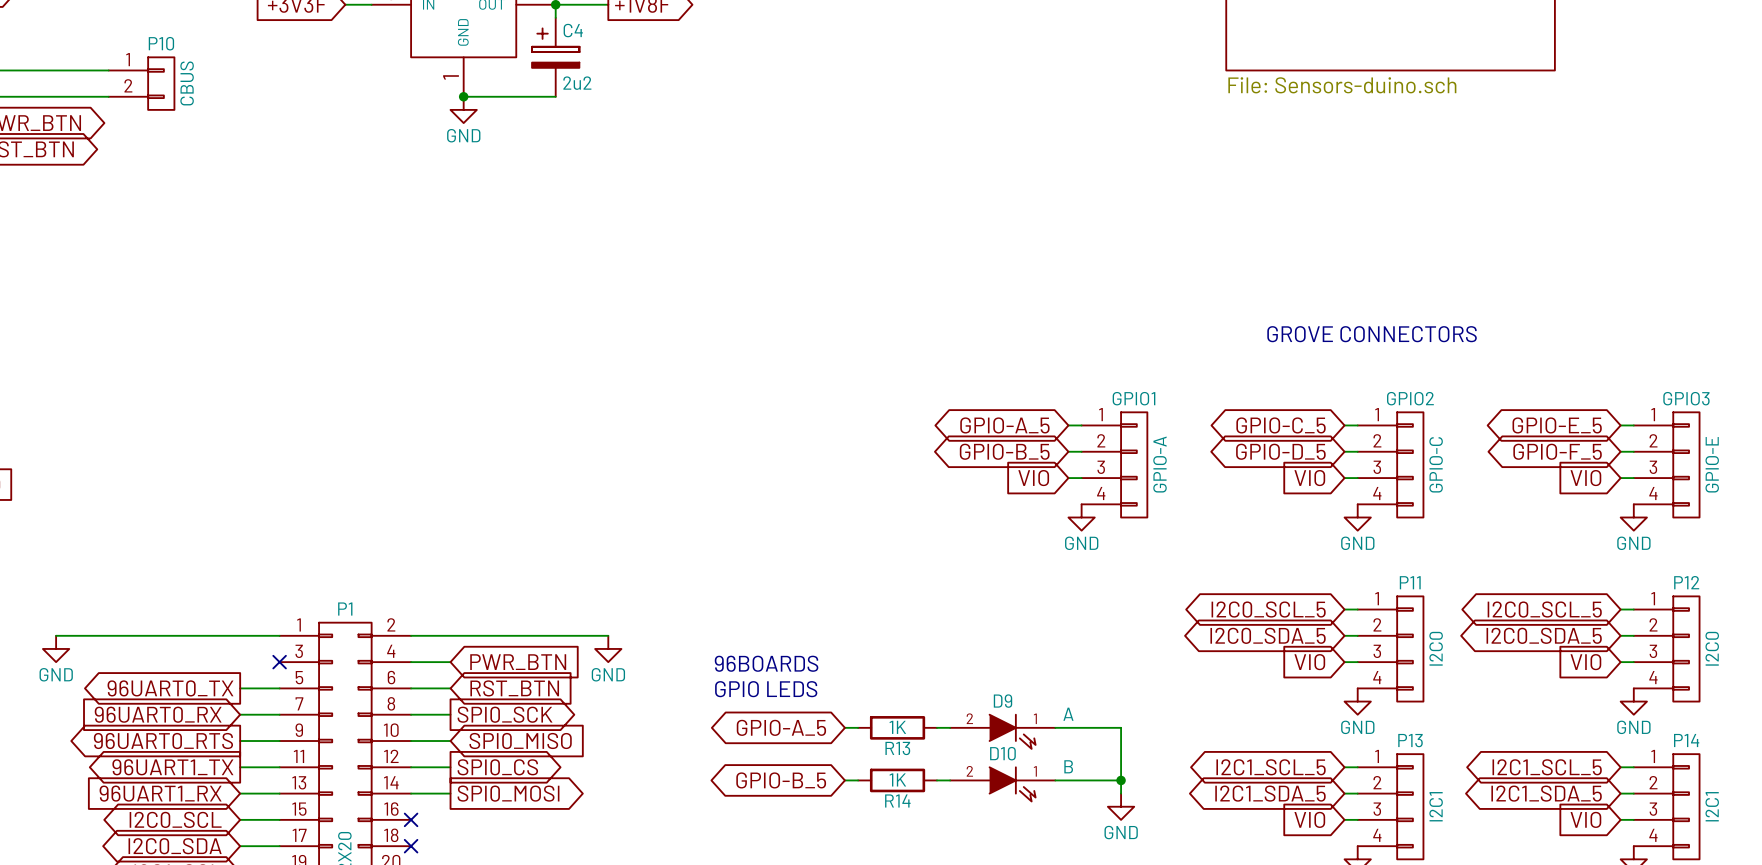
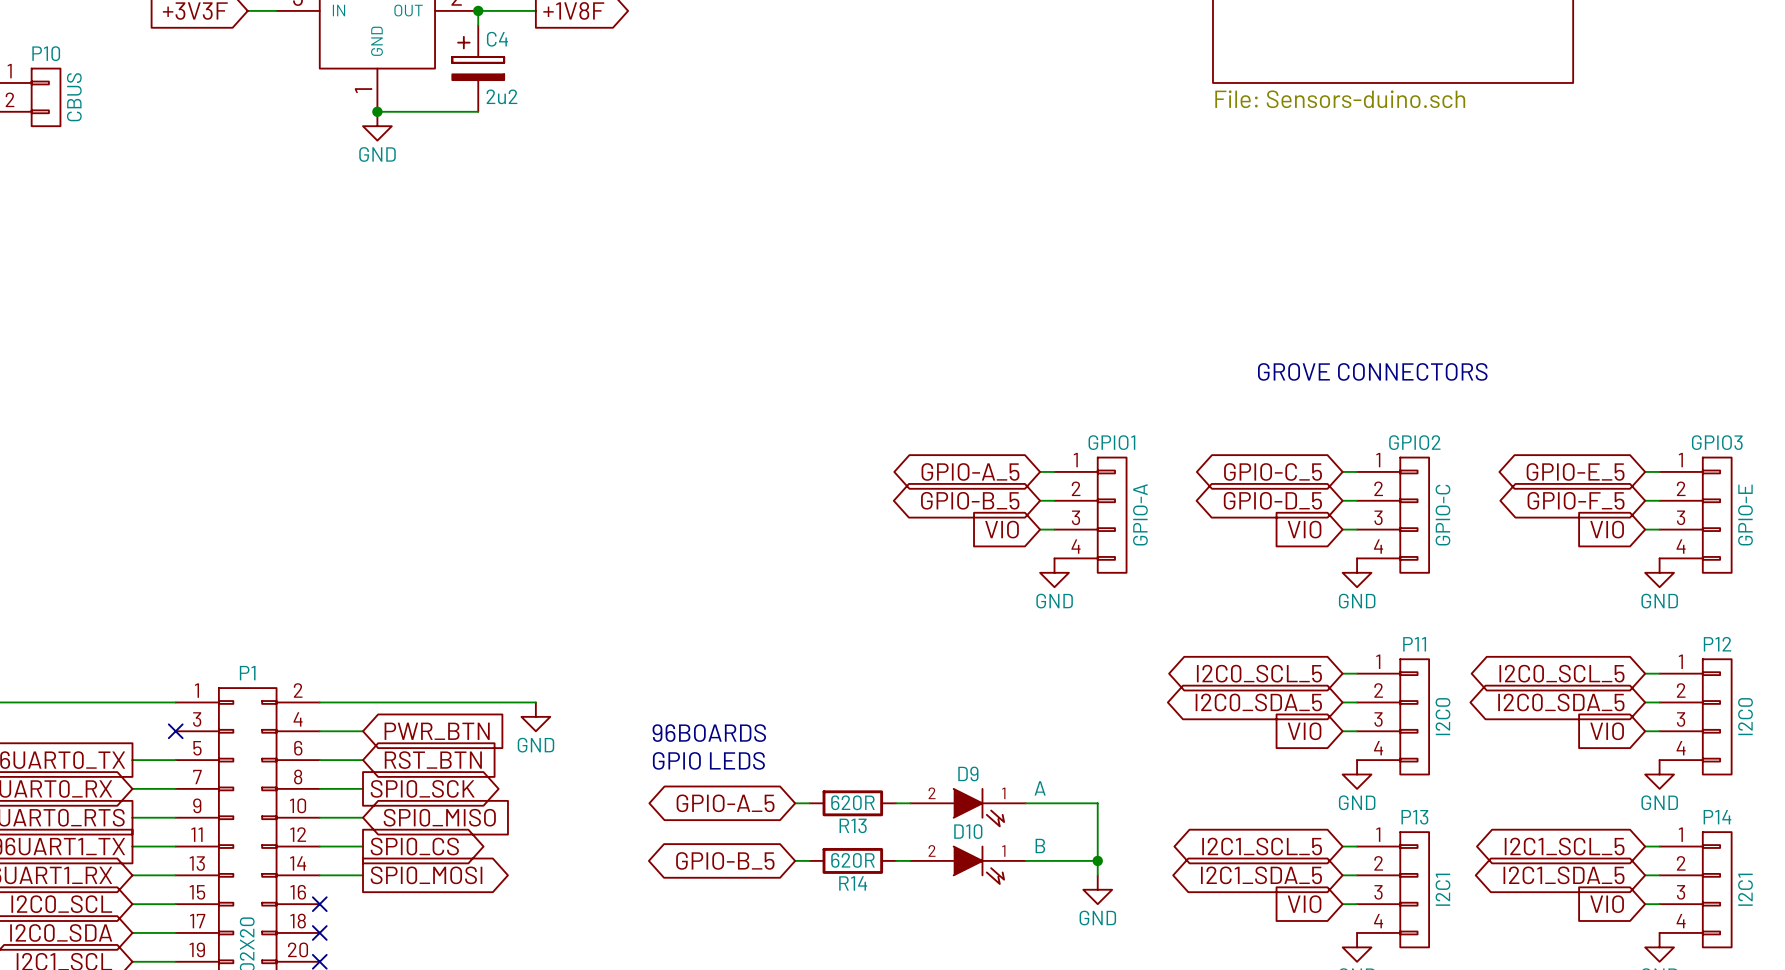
R13 value: 1K (897, 727) -> 620R (852, 802)
R14 value: 1K (897, 779) -> 620R (852, 860)

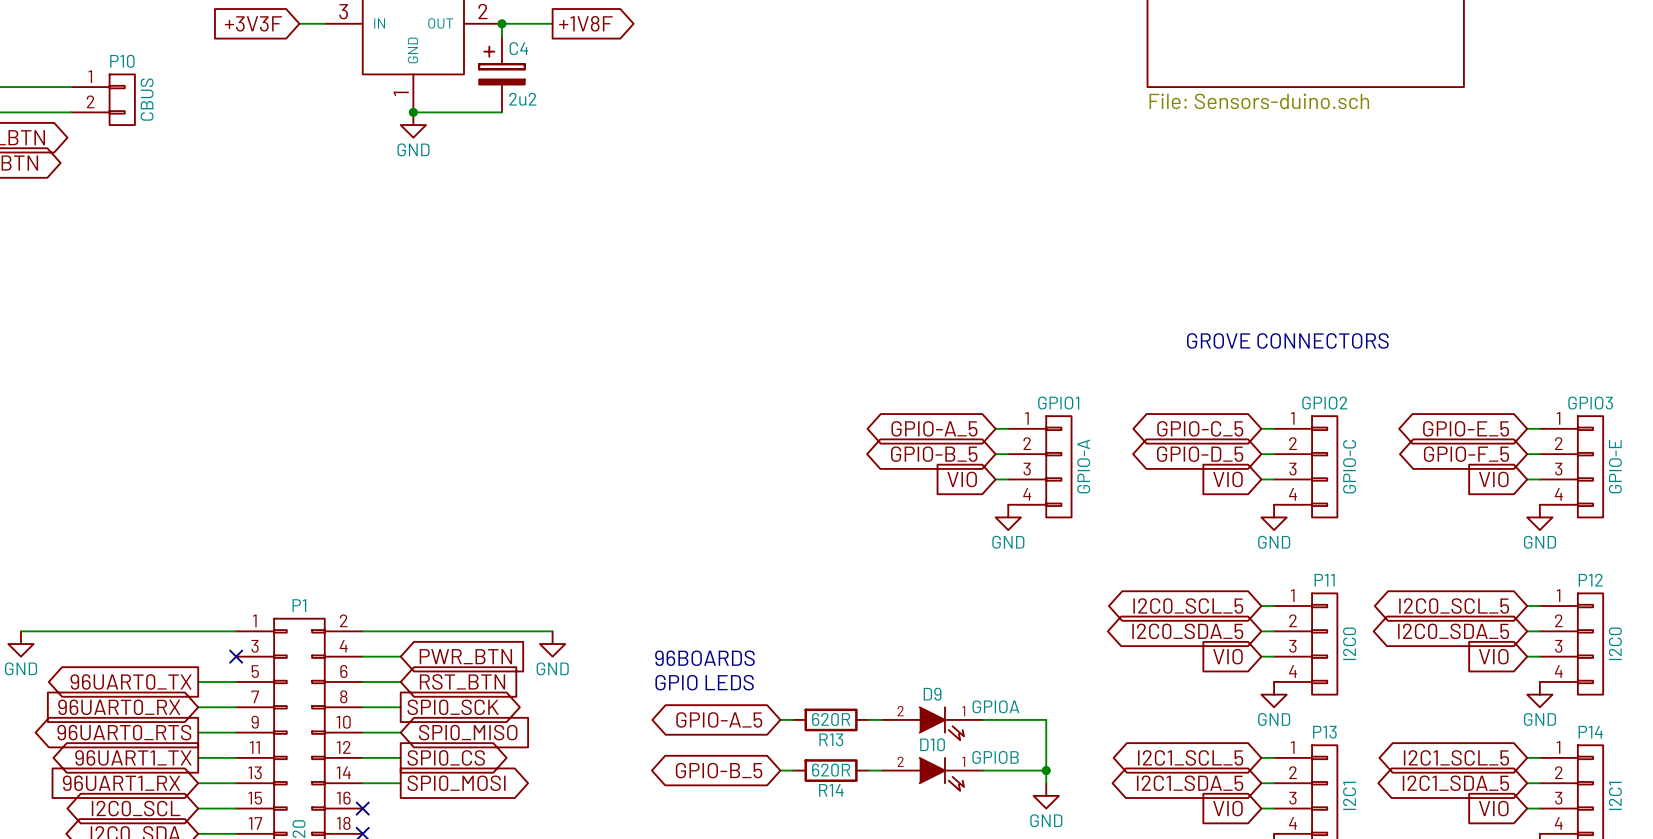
D9 value: A (1040, 788) -> GPIOA (995, 706)
D10 value: B (1040, 845) -> GPIOB (995, 757)

